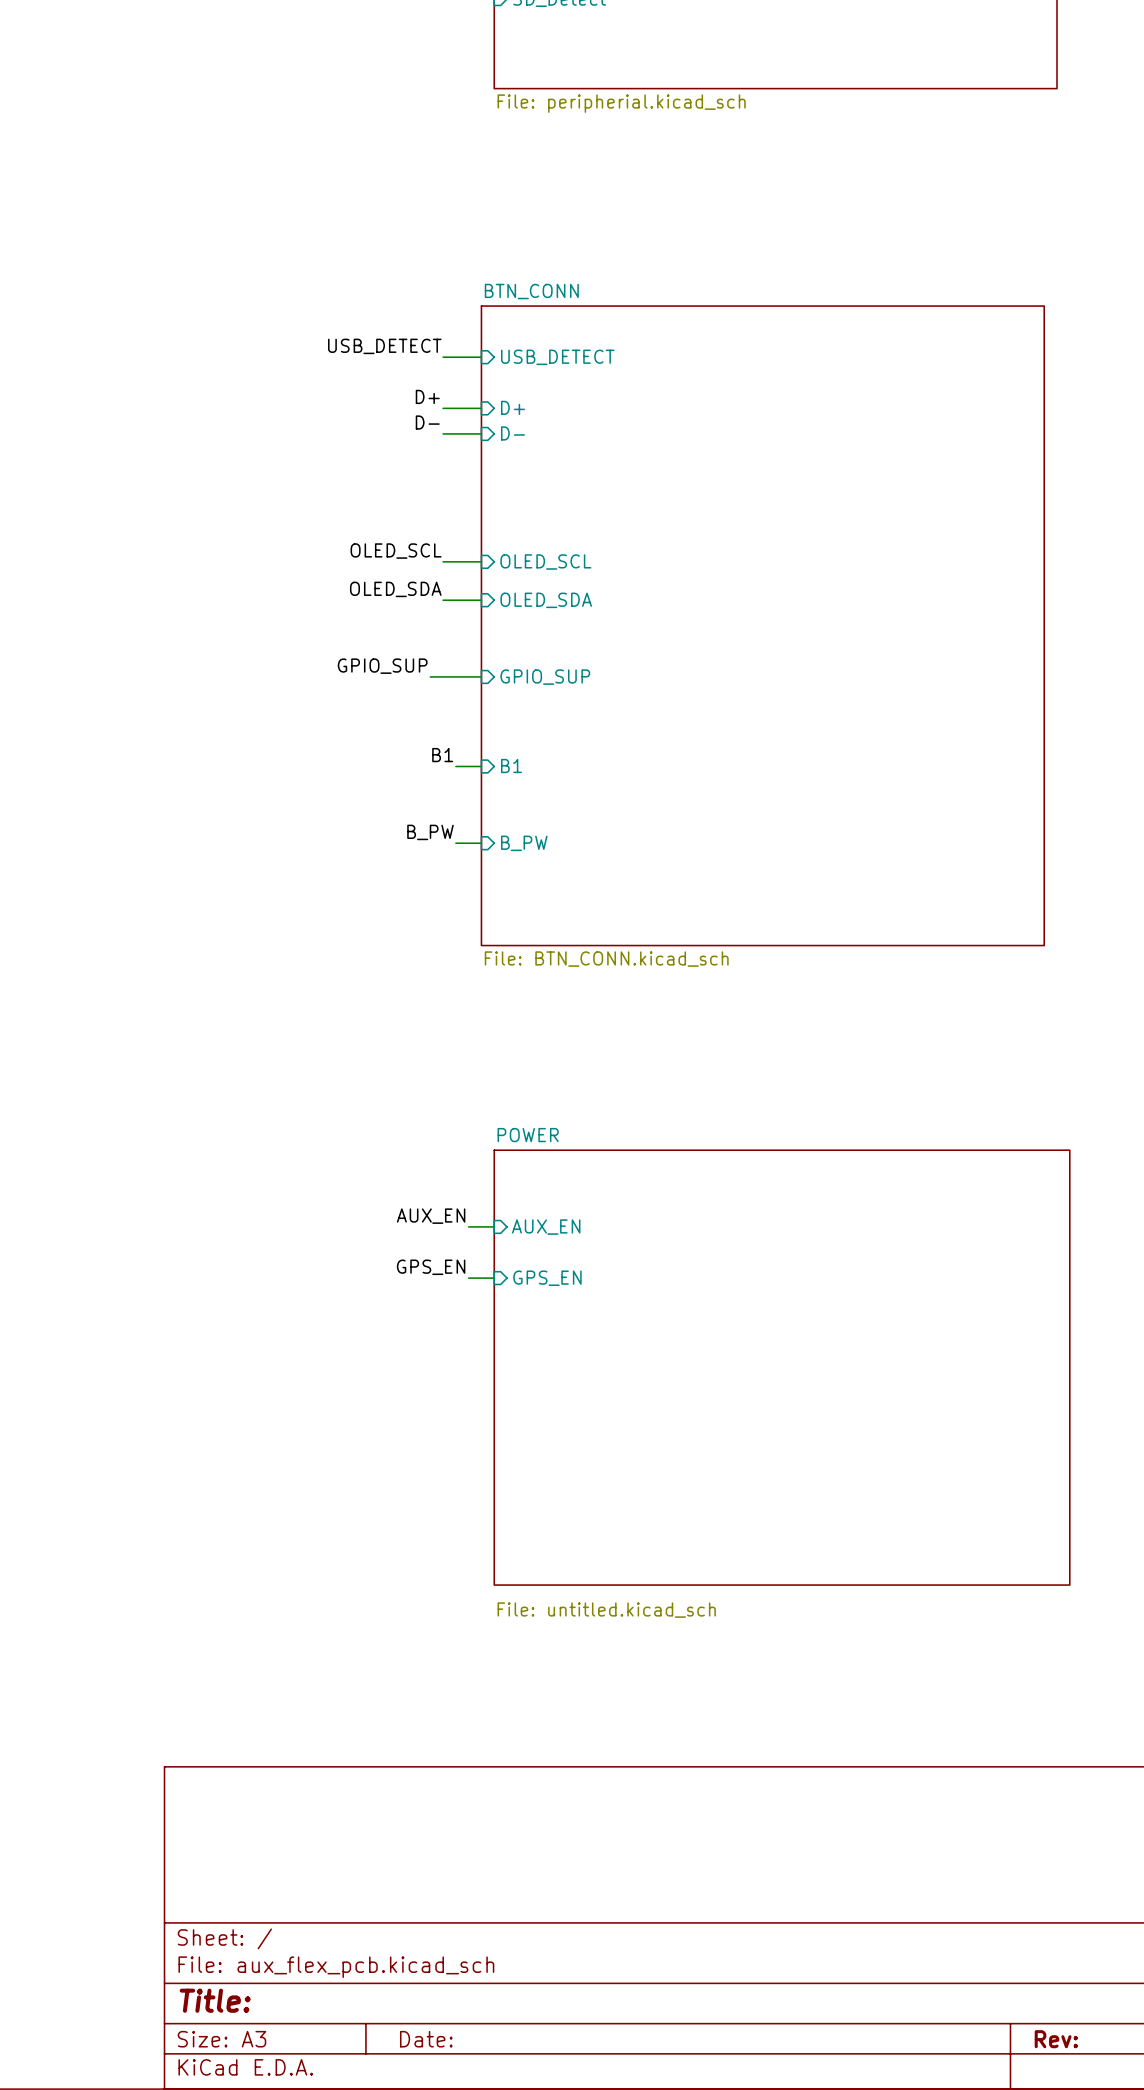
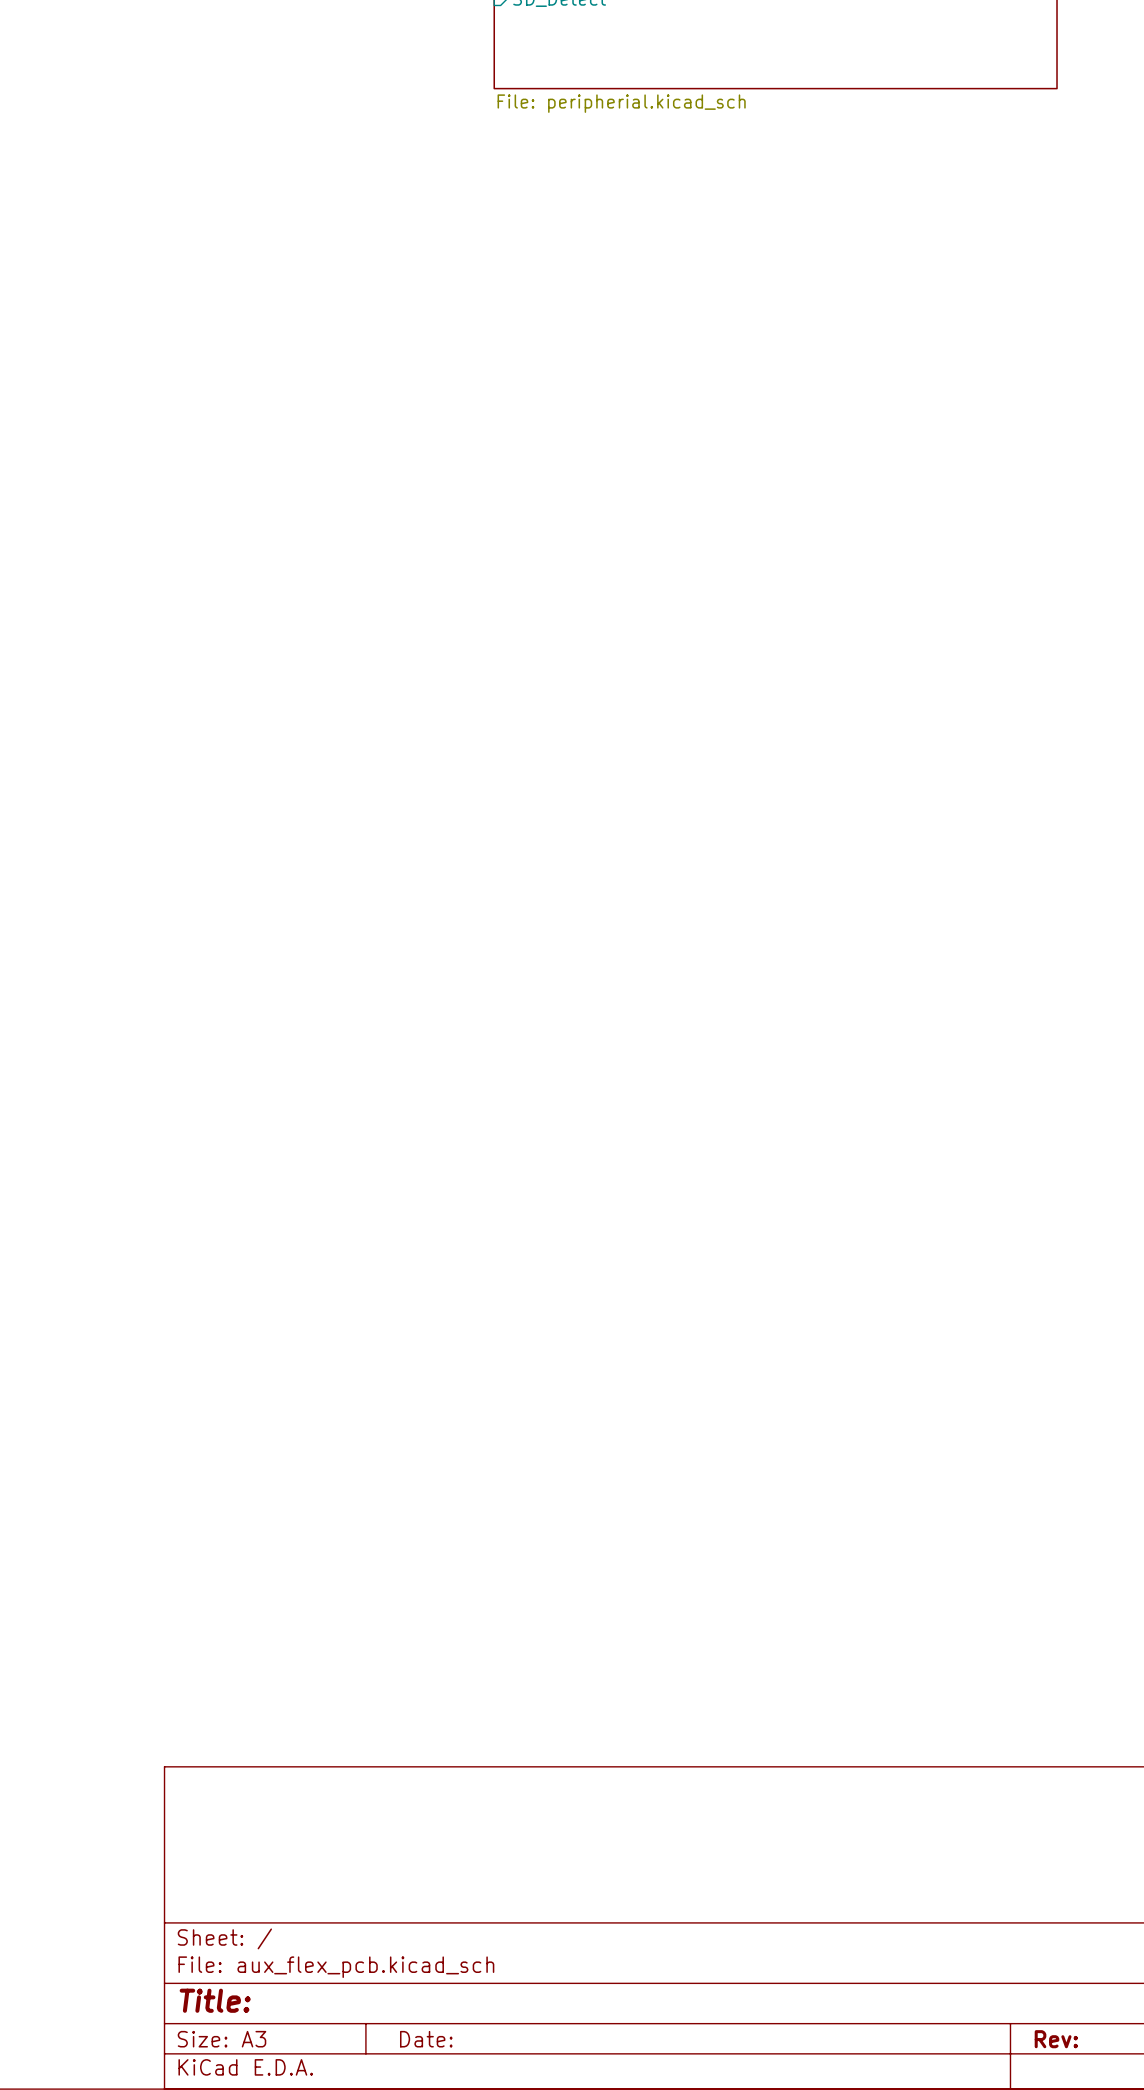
label: USB_DETECT (384, 346) -> none
wire: (443, 357) (481, 357) -> none
sheet pin: USB_DETECT (557, 357) -> none
label: D+ (427, 396) -> none
sheet pin: D+ (513, 407) -> none
wire: (443, 408) (481, 408) -> none
label: D- (427, 422) -> none
wire: (443, 433) (481, 433) -> none
sheet pin: D- (513, 433) -> none
label: OLED_SCL (396, 551) -> none
wire: (443, 561) (481, 561) -> none
sheet pin: OLED_SCL (545, 561) -> none
label: OLED_SDA (395, 589) -> none
wire: (443, 600) (481, 600) -> none
sheet pin: OLED_SDA (546, 600) -> none
sheet BTN_CONN: File: BTN_CONN.kicad_sch (762, 625) -> none
label: GPIO_SUP (382, 666) -> none
wire: (430, 676) (481, 676) -> none
sheet pin: GPIO_SUP (545, 677) -> none
label: B1 (442, 755) -> none
wire: (455, 766) (481, 766) -> none
sheet pin: B1 (511, 766) -> none
label: B_PW (430, 832) -> none
wire: (455, 843) (481, 843) -> none
sheet pin: B_PW (524, 843) -> none
label: AUX_EN (431, 1216) -> none
wire: (468, 1226) (494, 1226) -> none
sheet pin: AUX_EN (546, 1227) -> none
label: GPS_EN (431, 1267) -> none
wire: (468, 1278) (494, 1278) -> none
sheet pin: GPS_EN (547, 1278) -> none
sheet POWER: File: untitled.kicad_sch (782, 1367) -> none

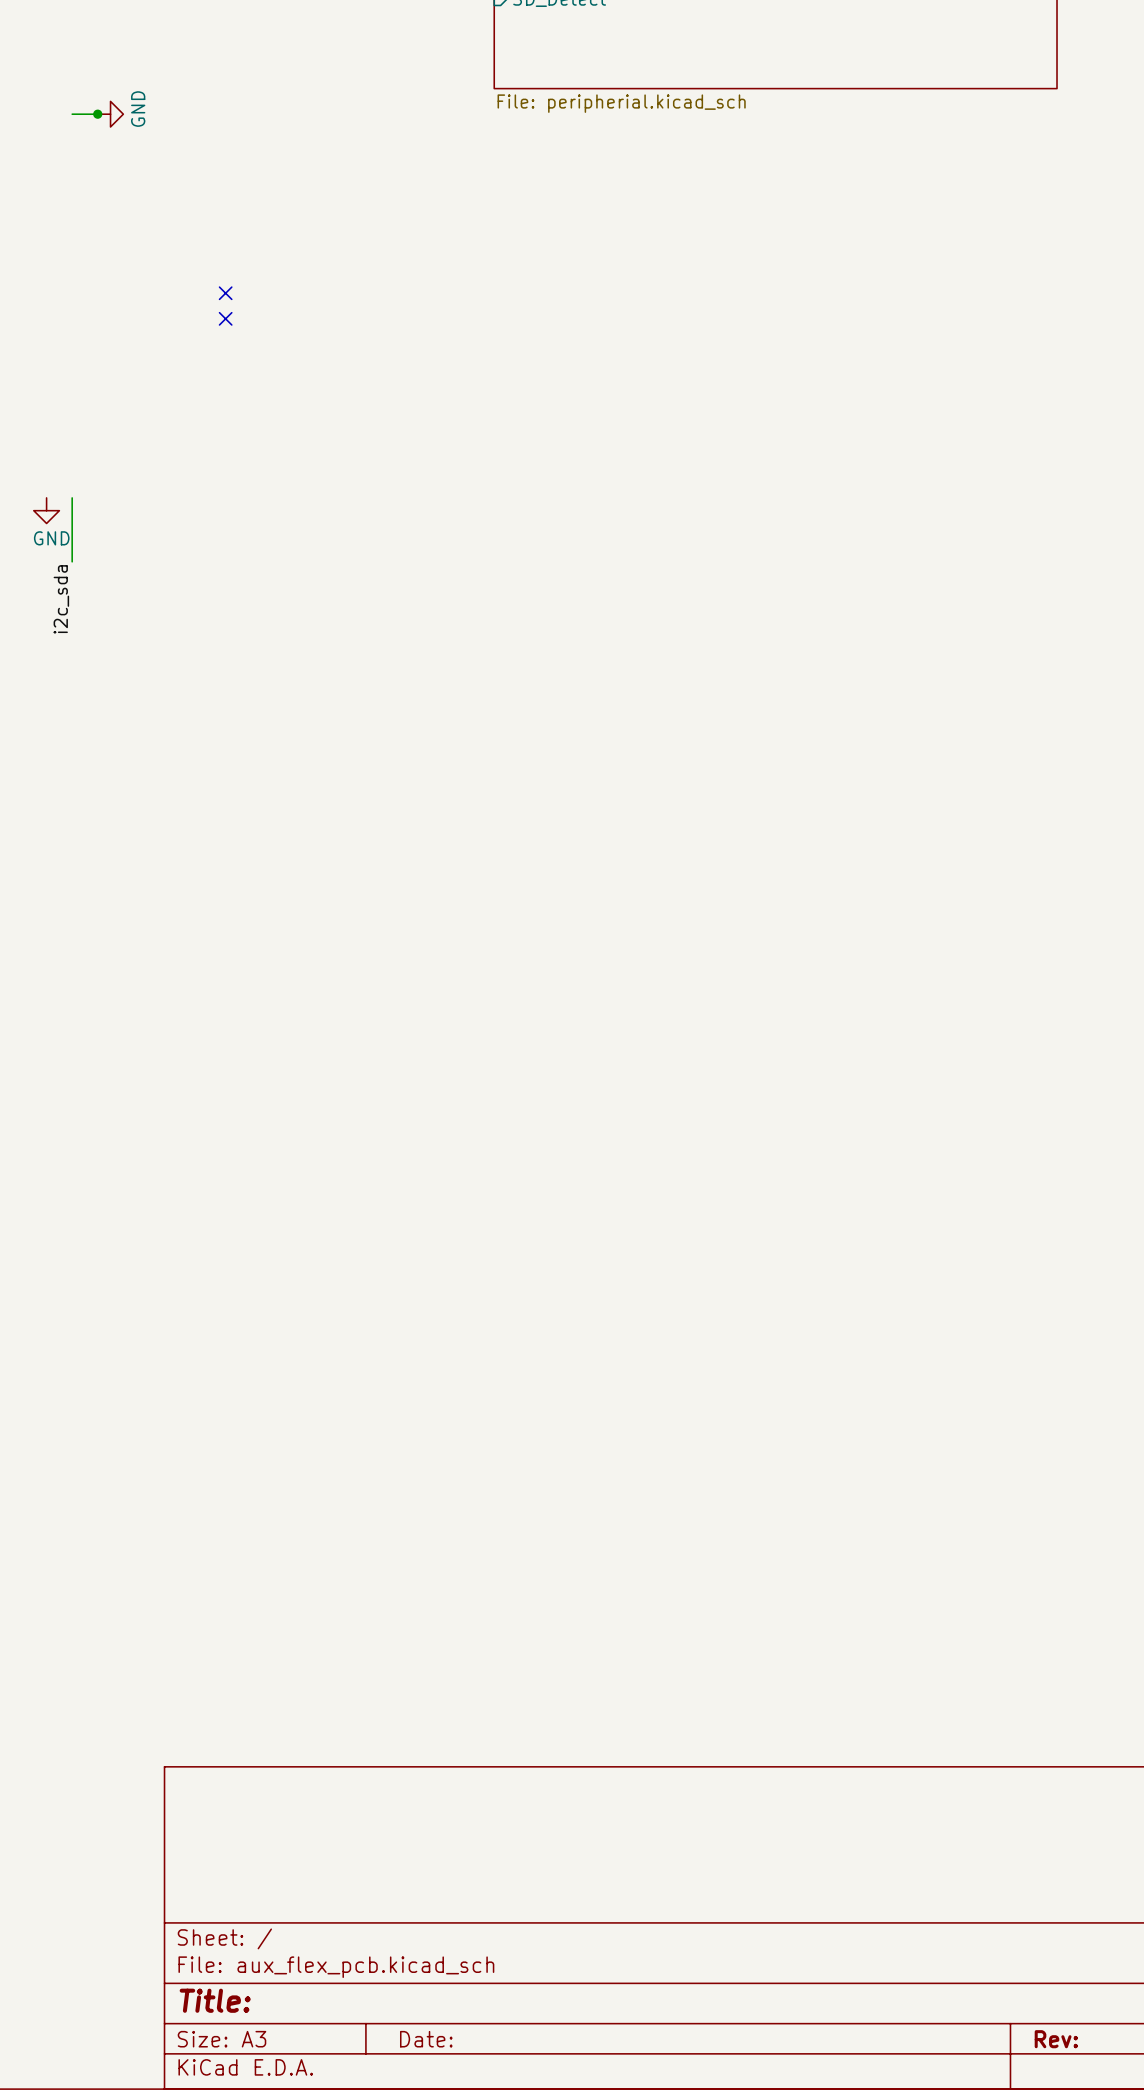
wire: none -> (72, 114) (97, 114)
junction: none -> (97, 114)
power symbol: none -> GND (110, 114)
no-connect mark: none -> (225, 293)
no-connect mark: none -> (225, 318)
wire: none -> (72, 497) (72, 561)
power symbol: none -> GND (46, 510)
label: none -> i2c_sda (61, 599)

